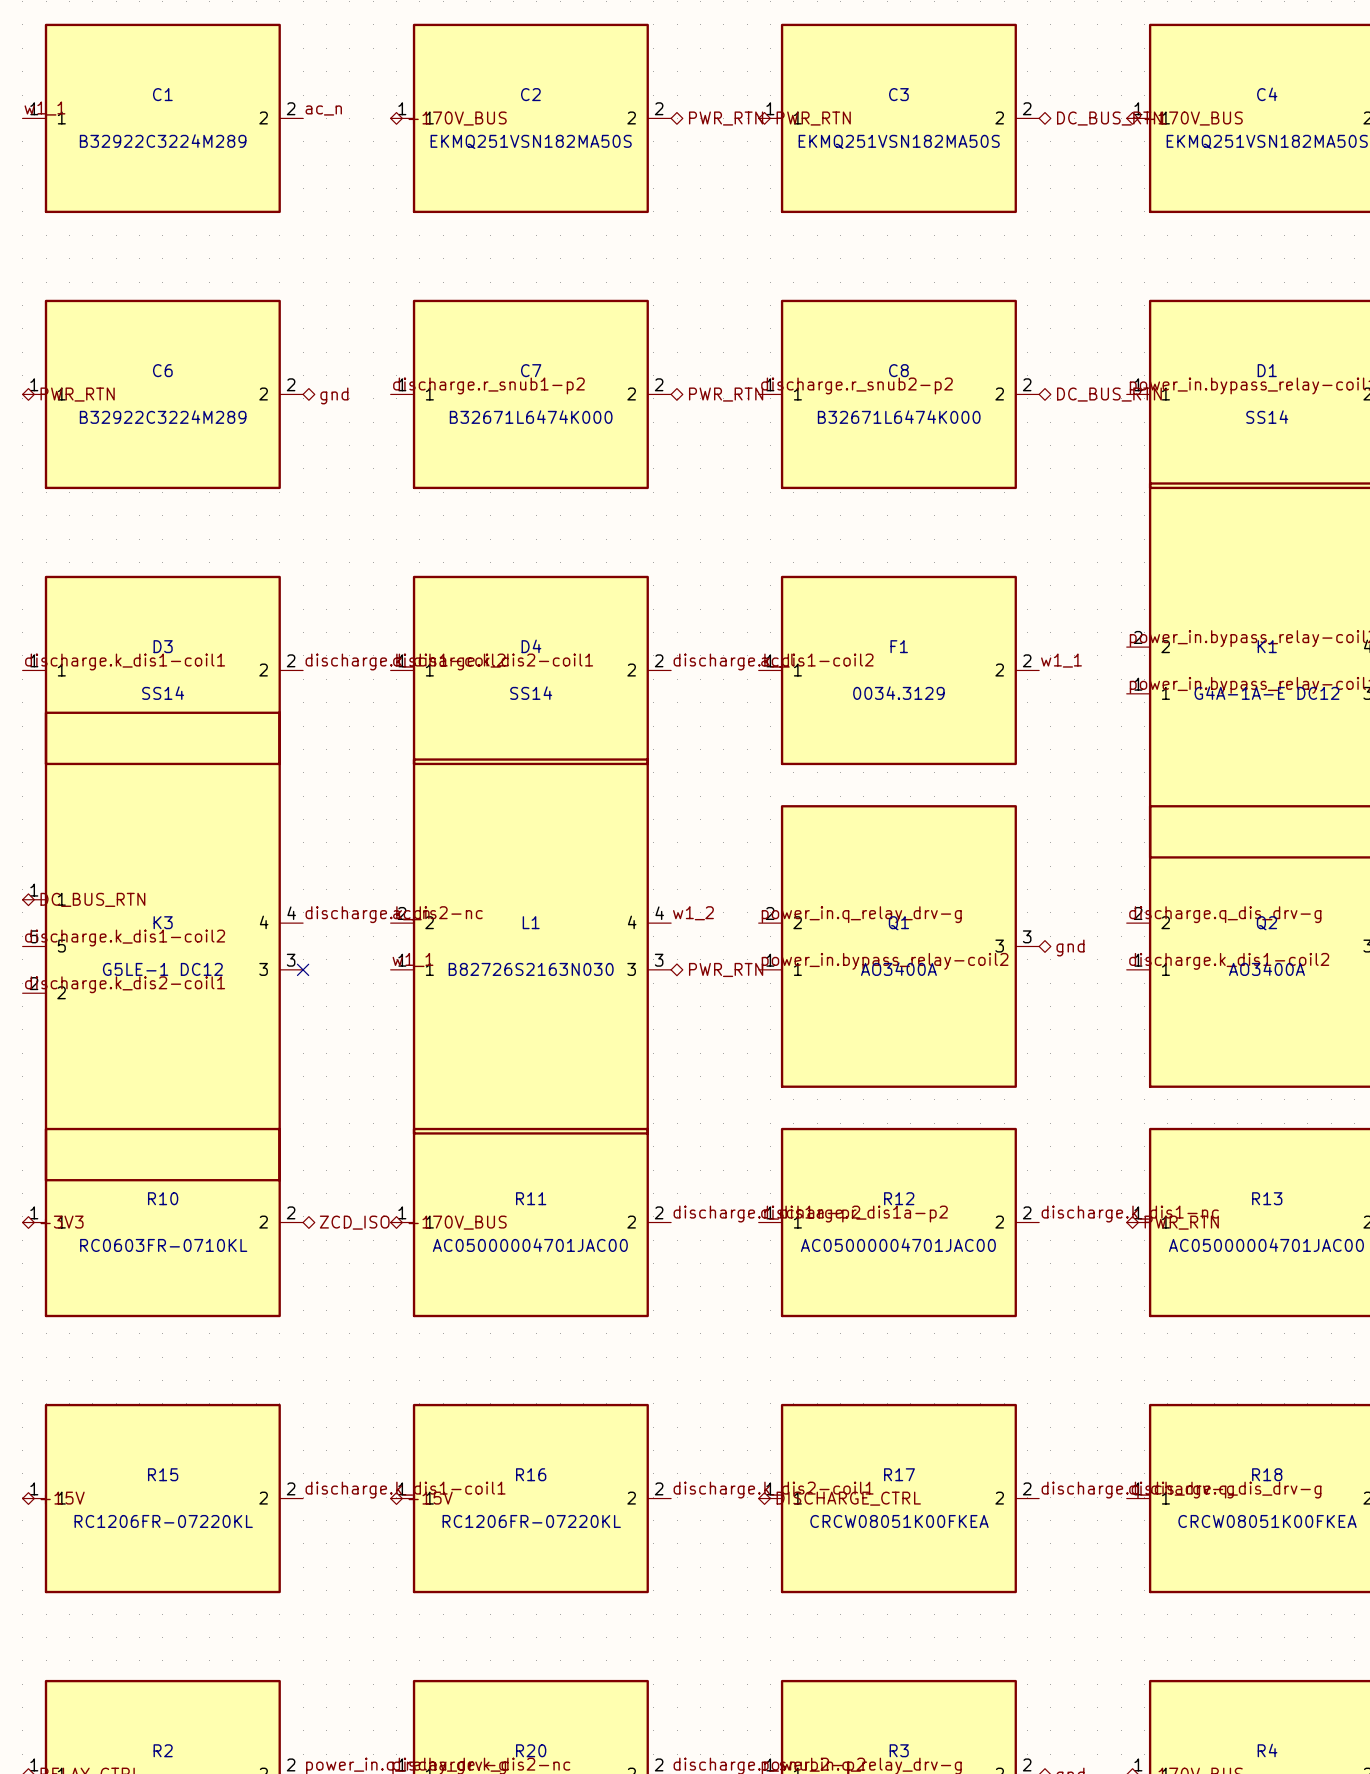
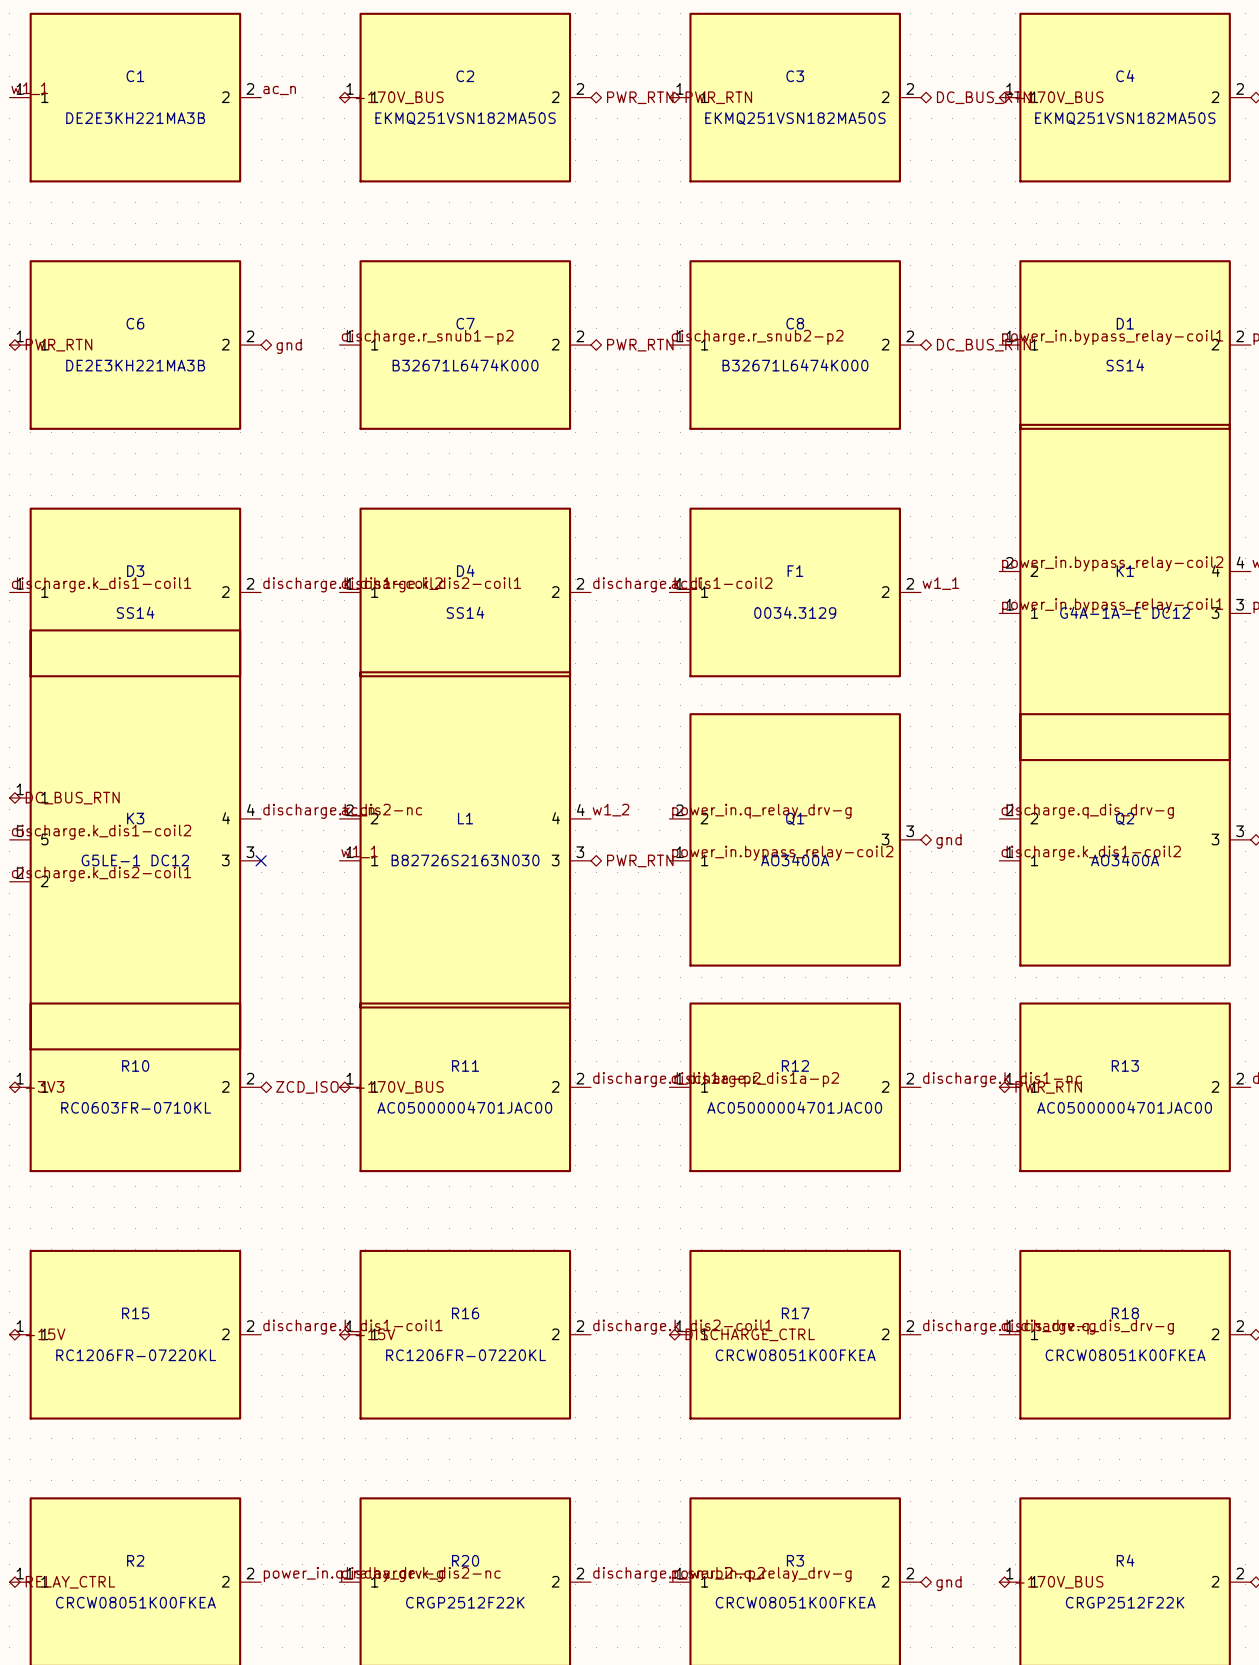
C1 value: B32922C3224M289 (163, 141) -> DE2E3KH221MA3B (135, 118)
C6 value: B32922C3224M289 (163, 417) -> DE2E3KH221MA3B (135, 365)

